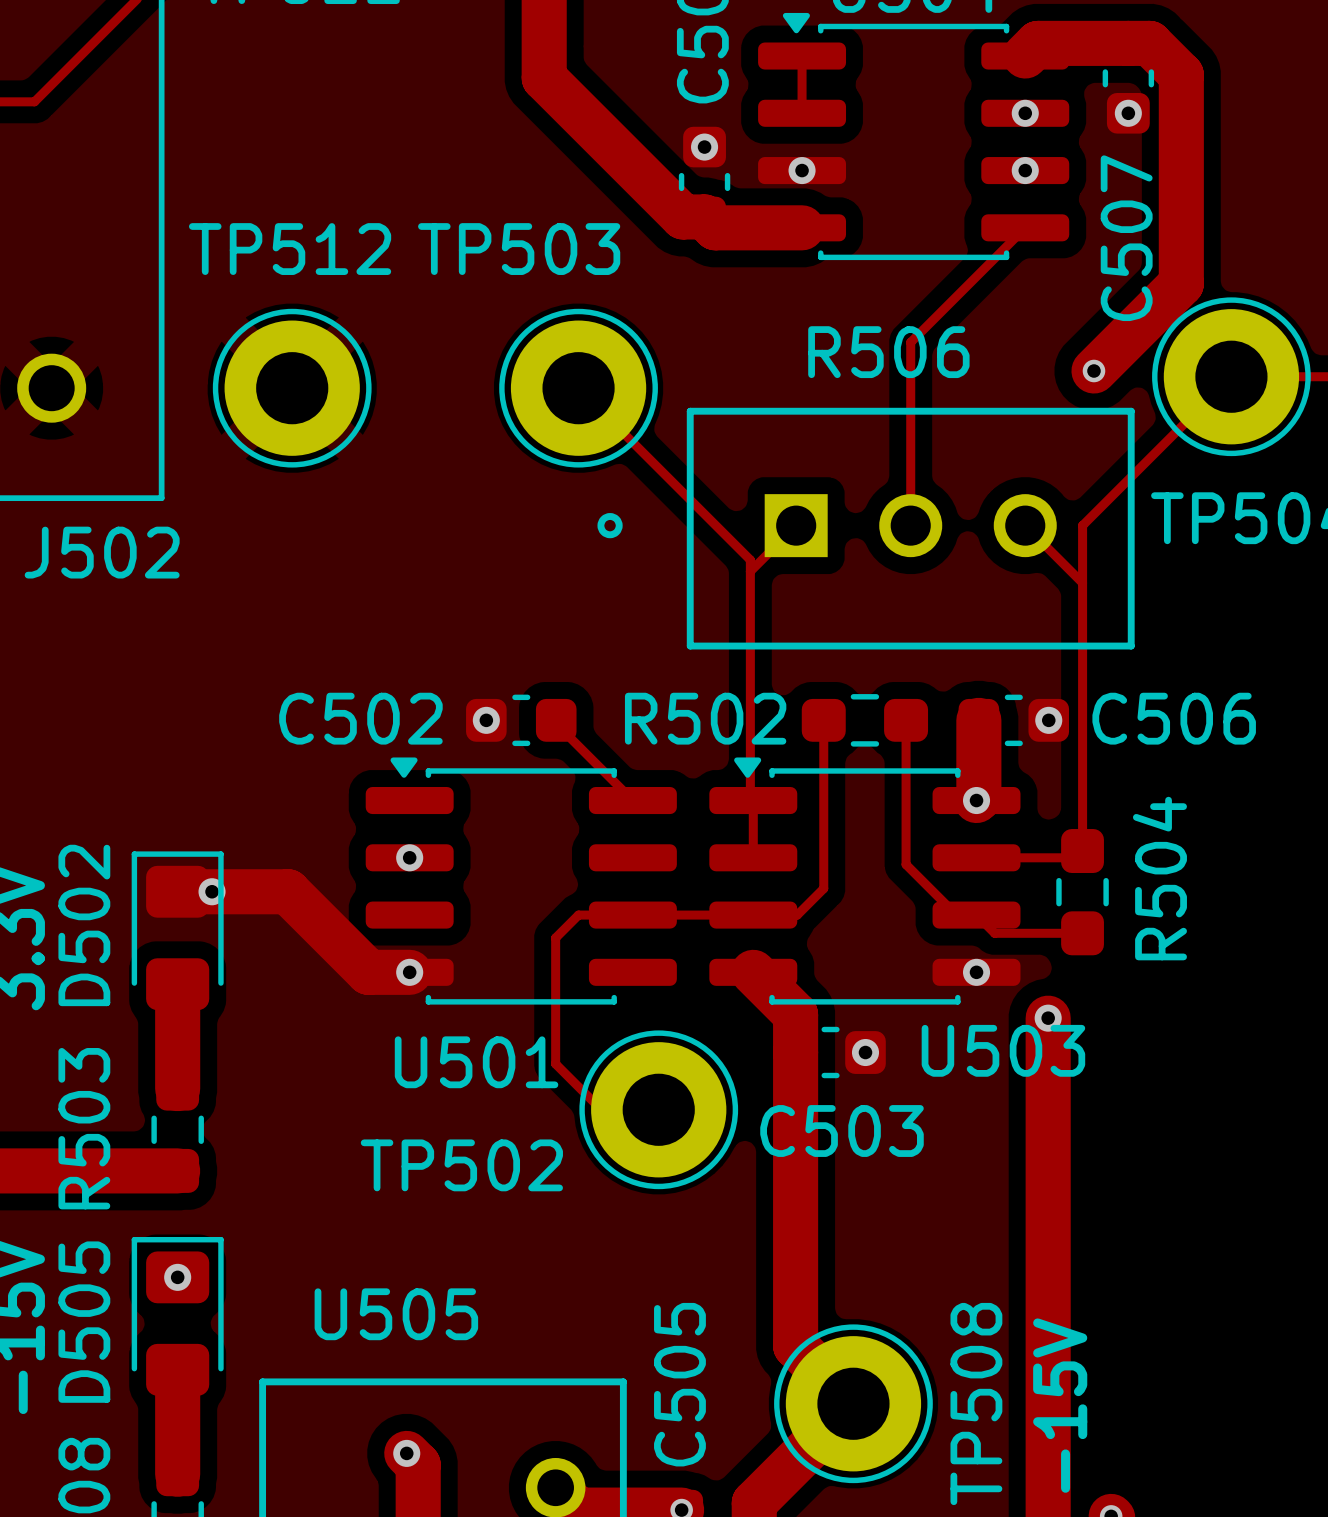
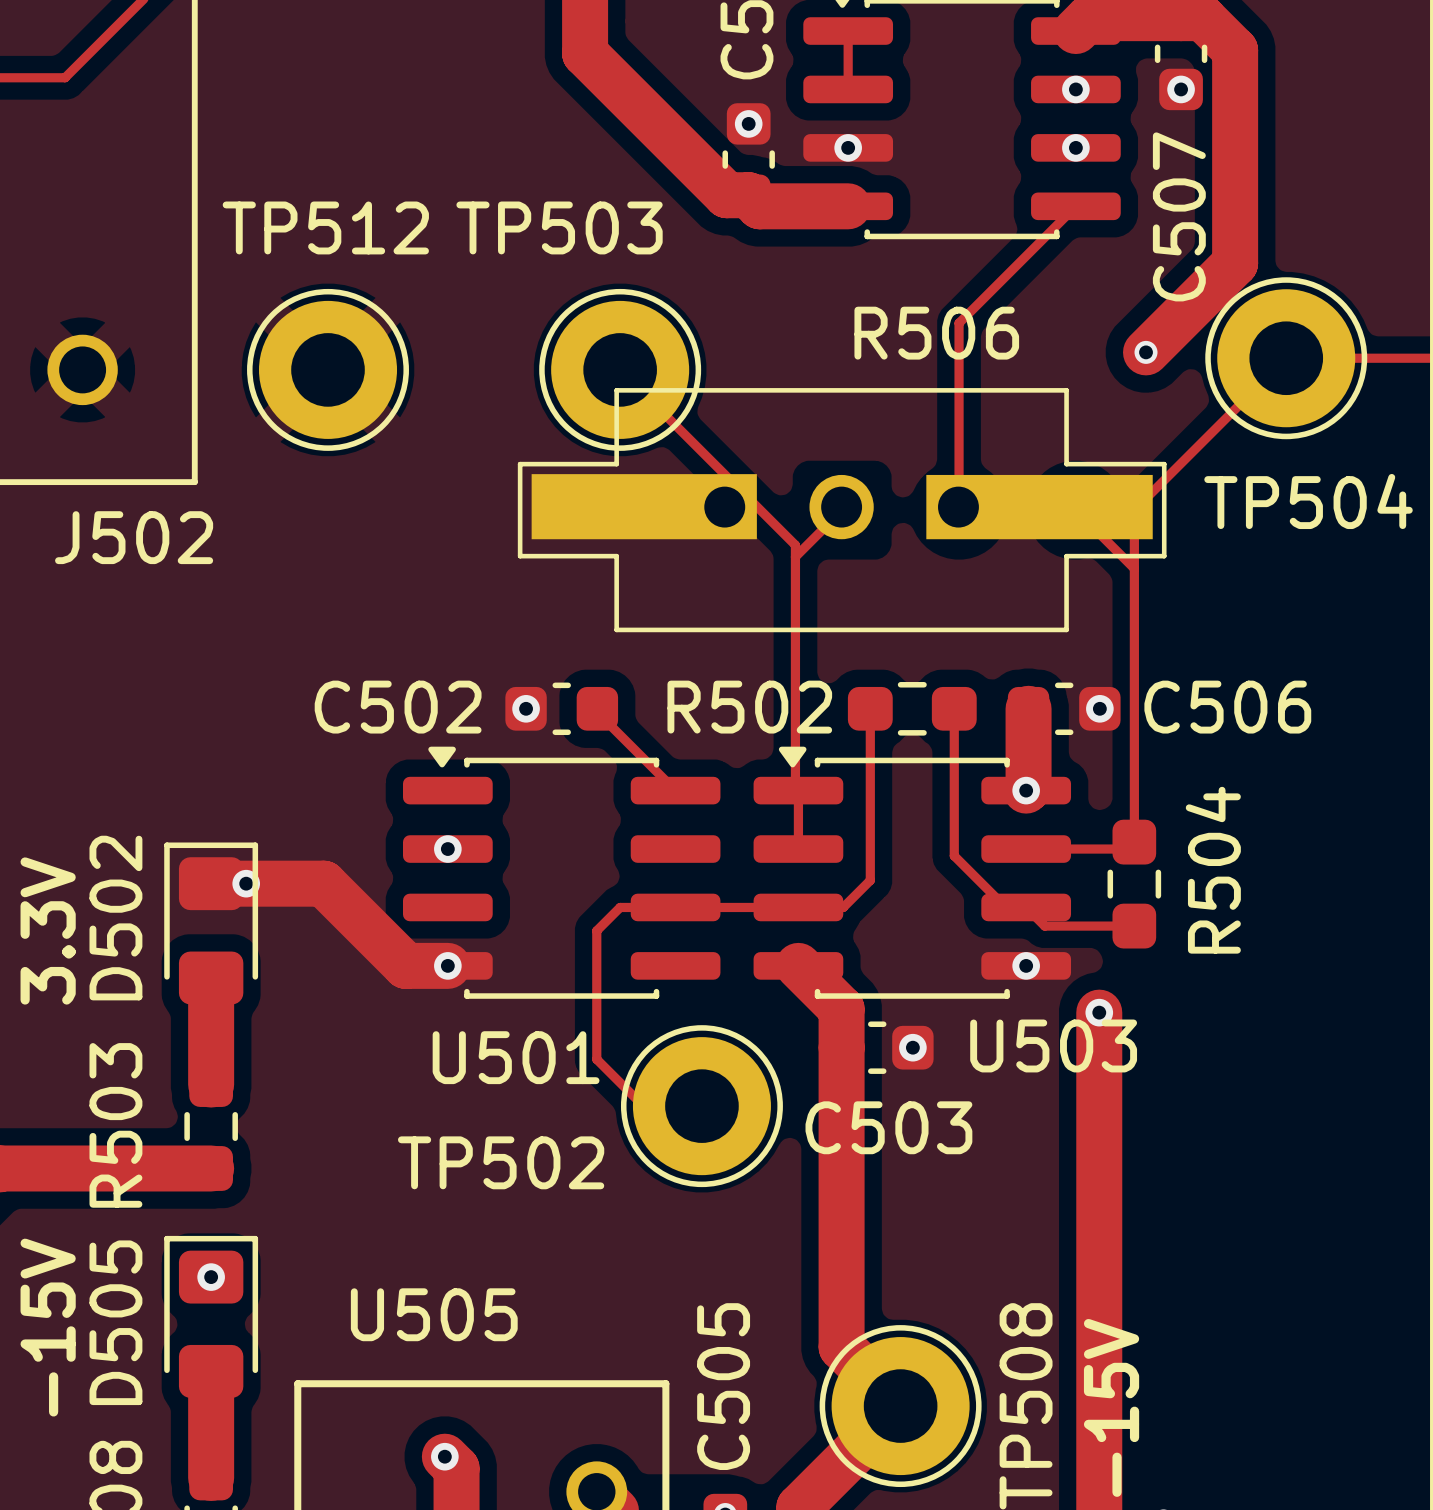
R506 footprint: [597, 407, 1135, 650] -> [517, 388, 1167, 633]

